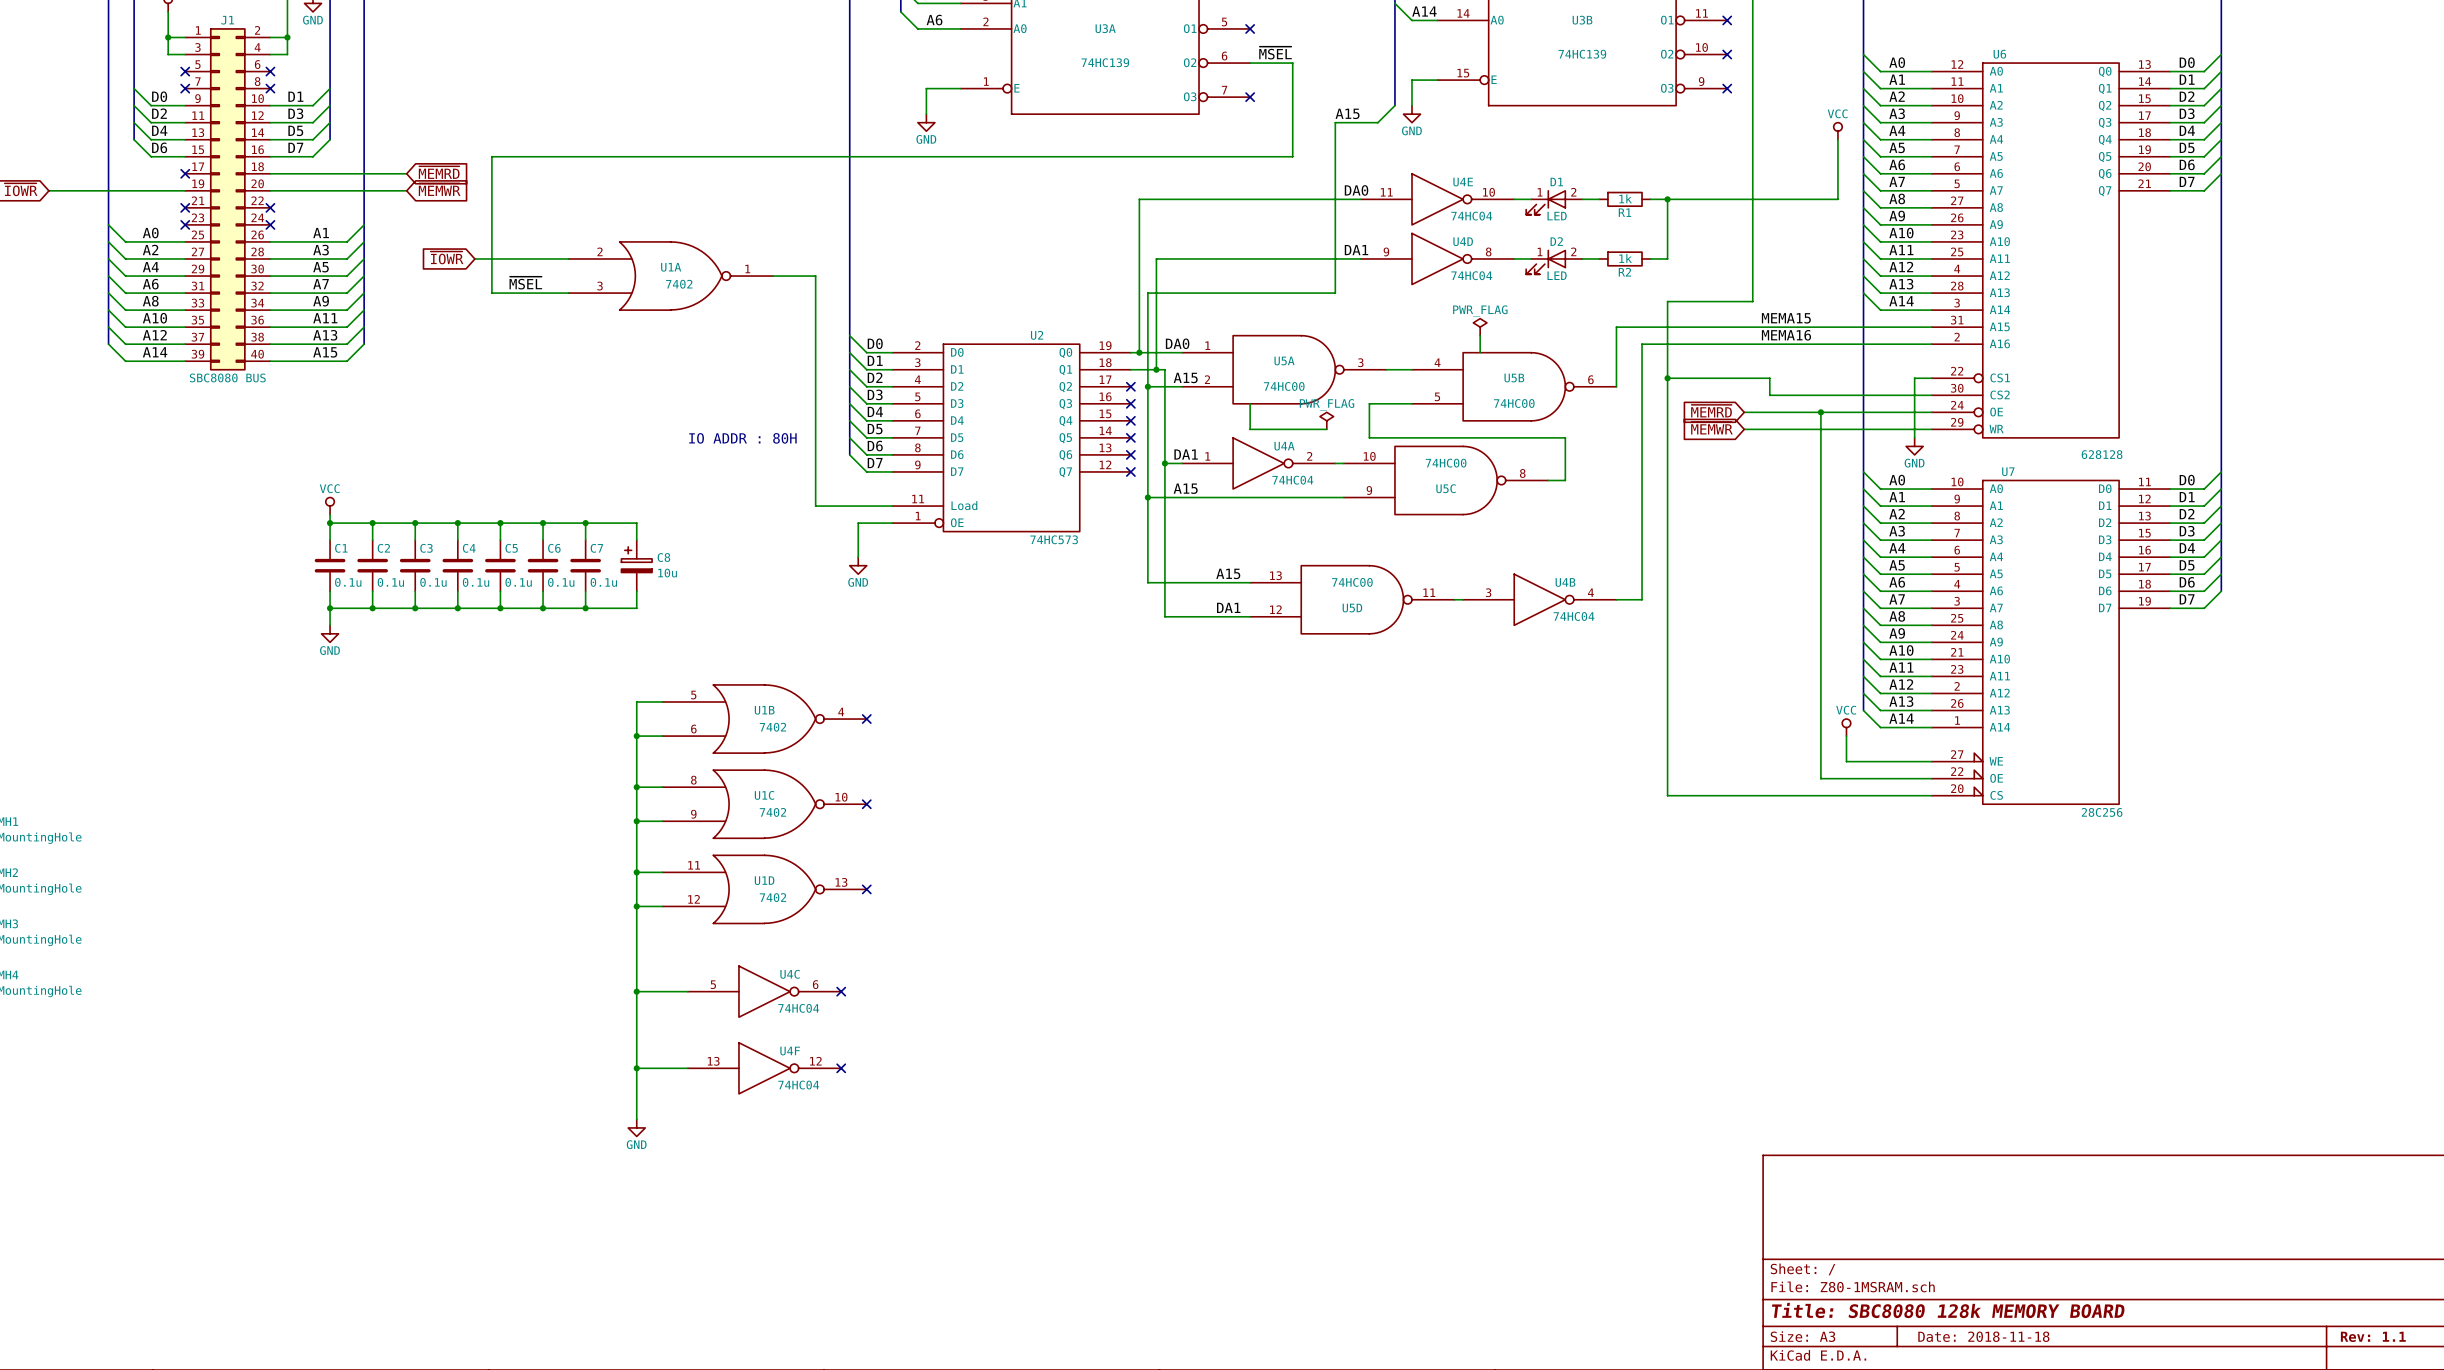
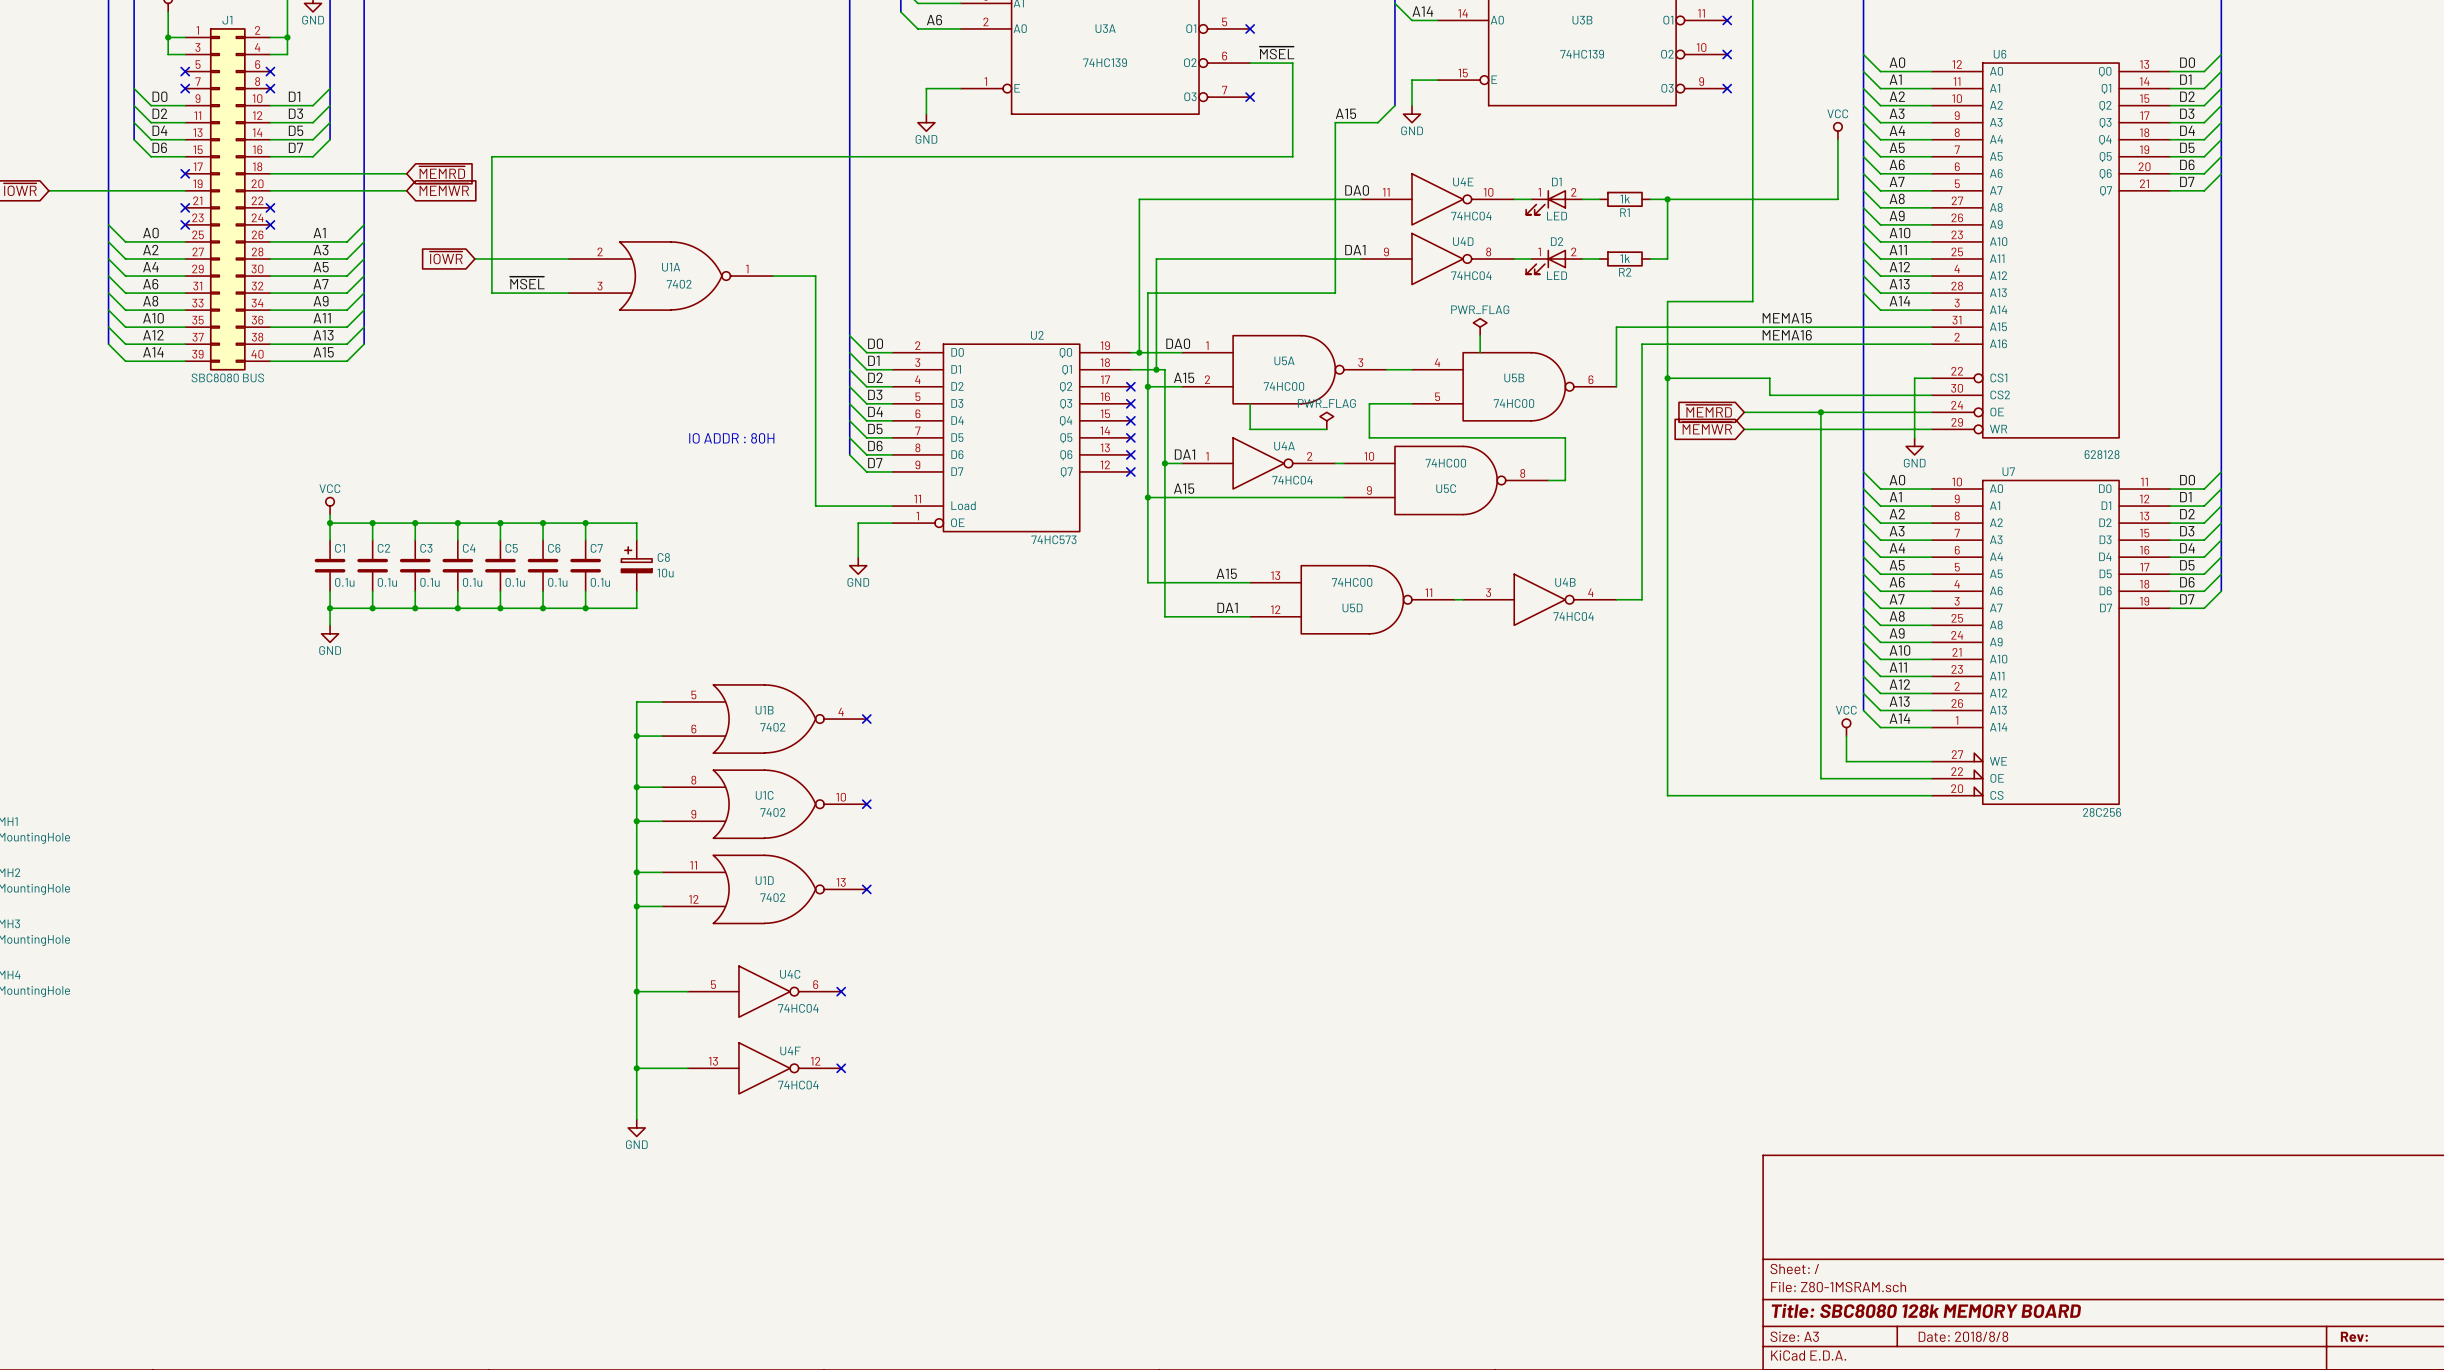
title block: Date: 2018-11-18 (1983, 1336) -> Date: 2018/8/8 (1963, 1336)
title block: Rev: 1.1 (2373, 1336) -> Rev: (2354, 1336)

